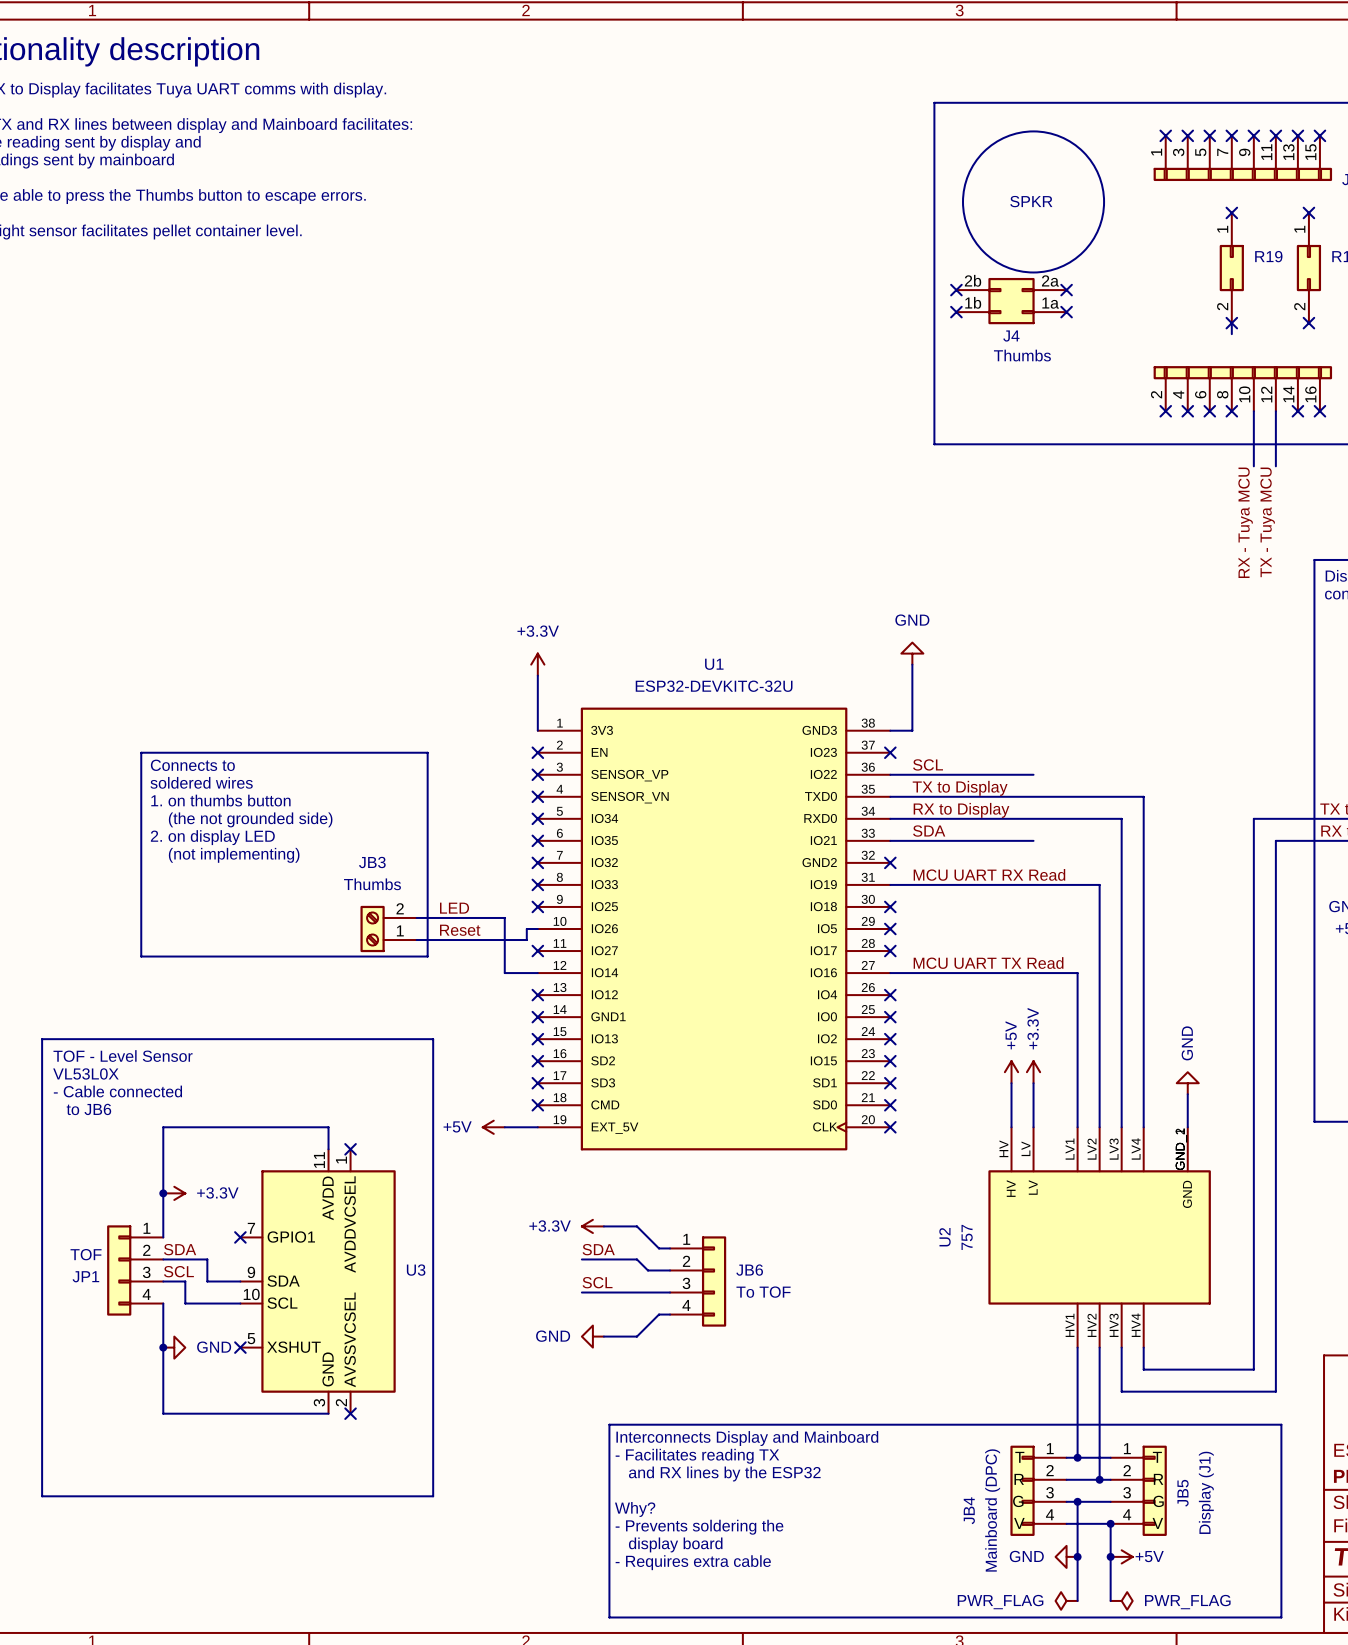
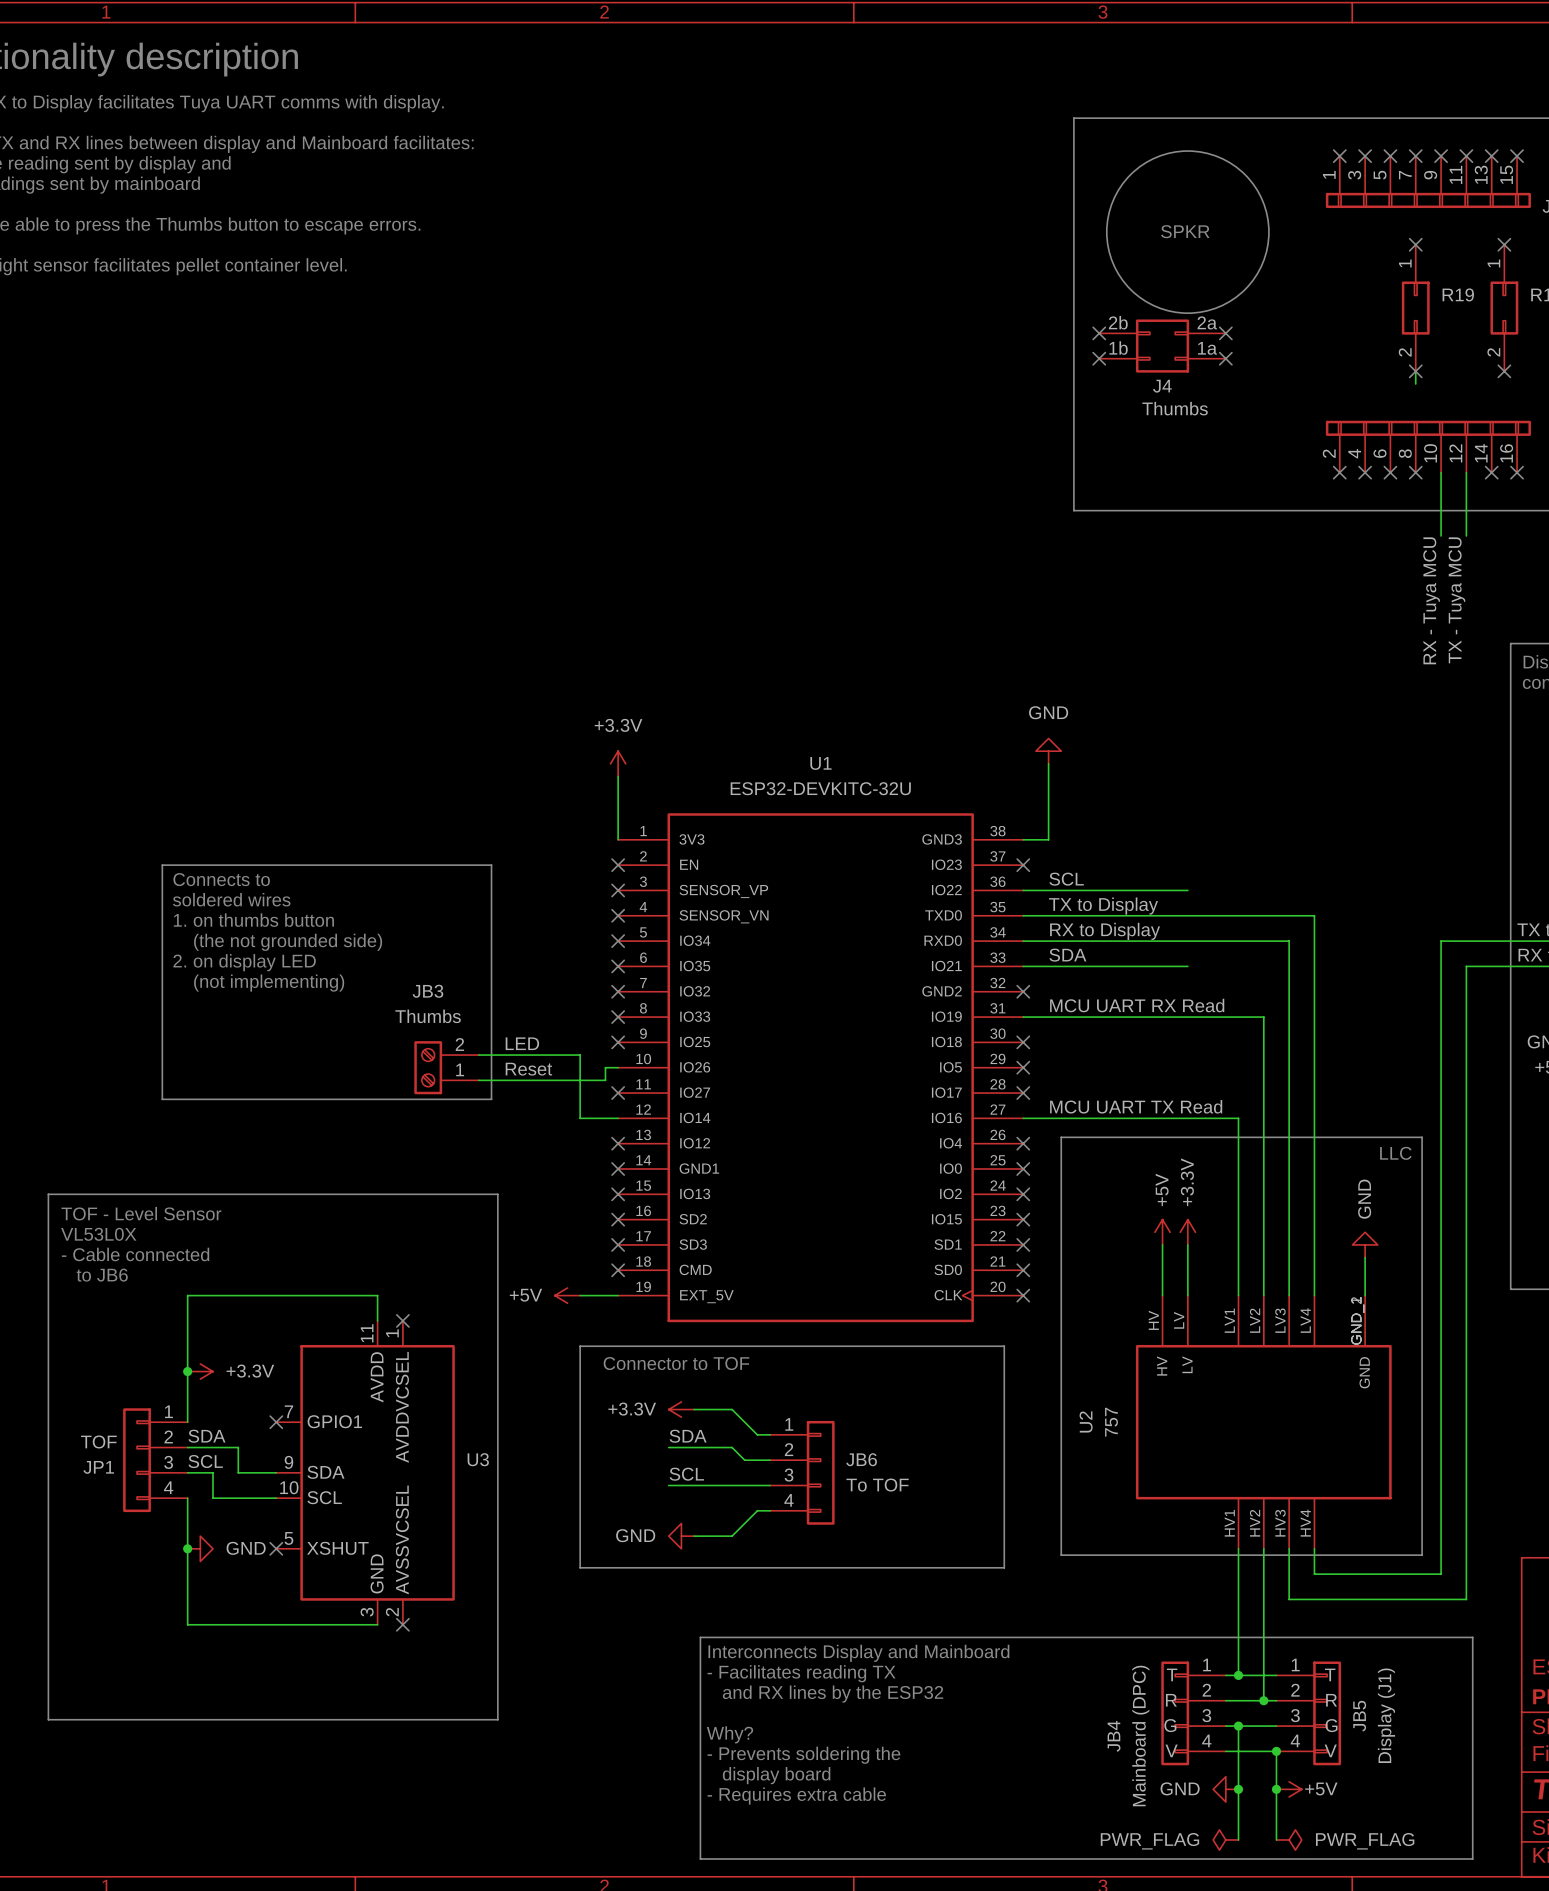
line: none -> (1061, 1137) (1422, 1137) (1422, 1555) (1061, 1555) (1061, 1137)
text: none -> LLC (1395, 1153)
line: none -> (580, 1346) (1004, 1346) (1004, 1567) (580, 1567) (580, 1346)
text: none -> Connector to TOF (676, 1363)

